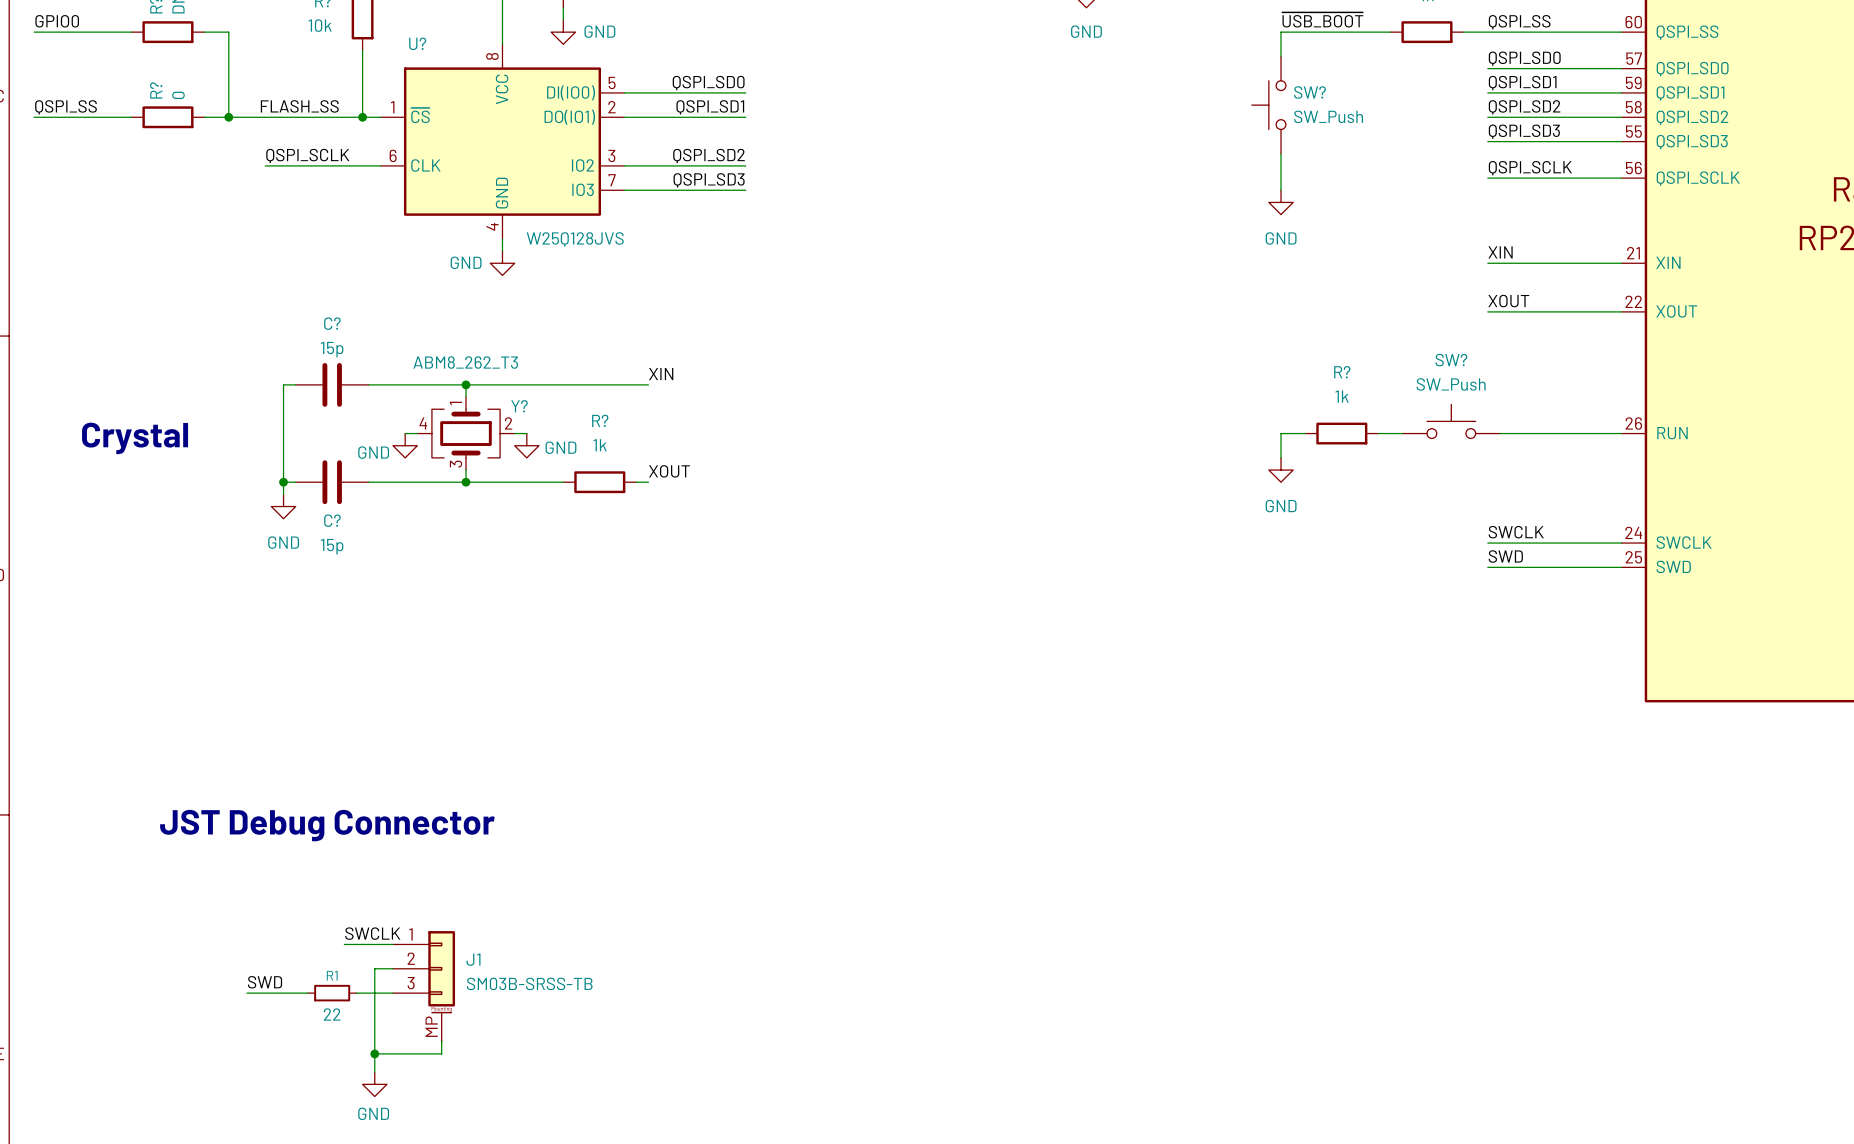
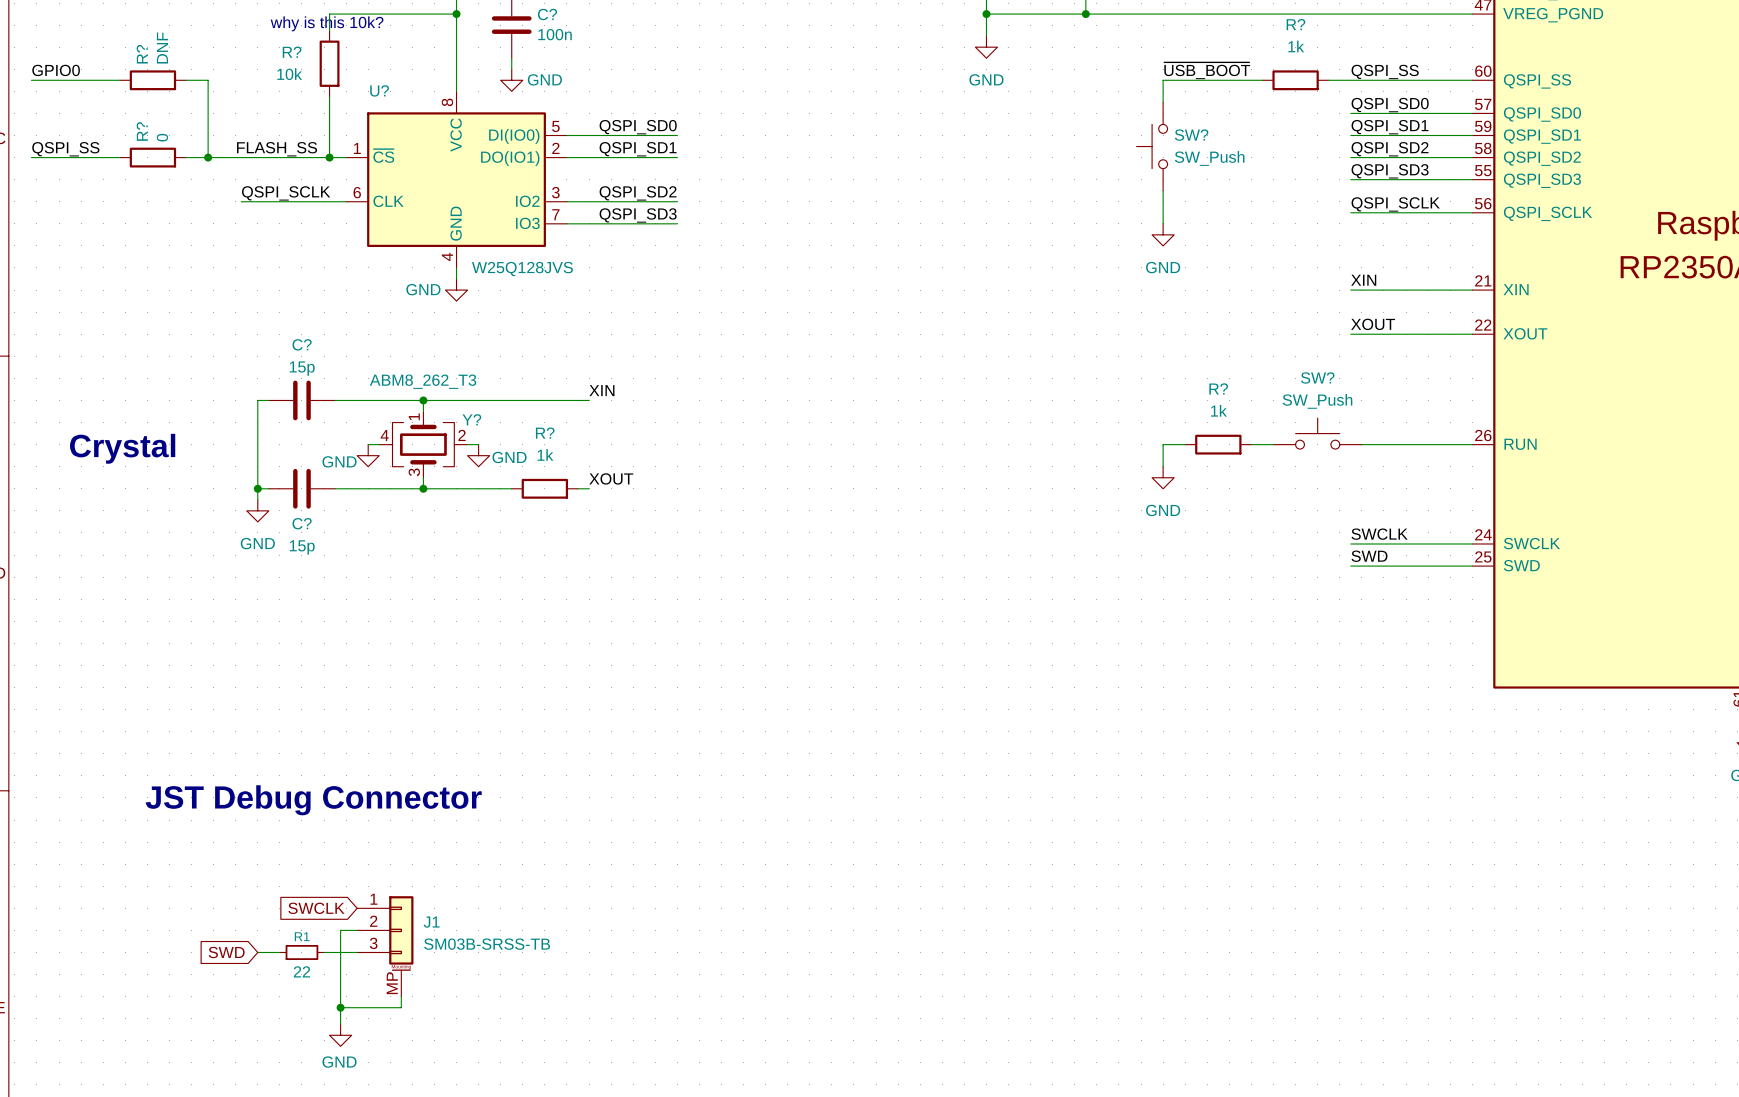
label: SWCLK (372, 933) -> none
wire: (344, 944) (393, 944) -> none
global label: none -> SWCLK (316, 908)
label: SWD (265, 982) -> none
wire: (247, 993) (283, 993) -> none
global label: none -> SWD (226, 952)

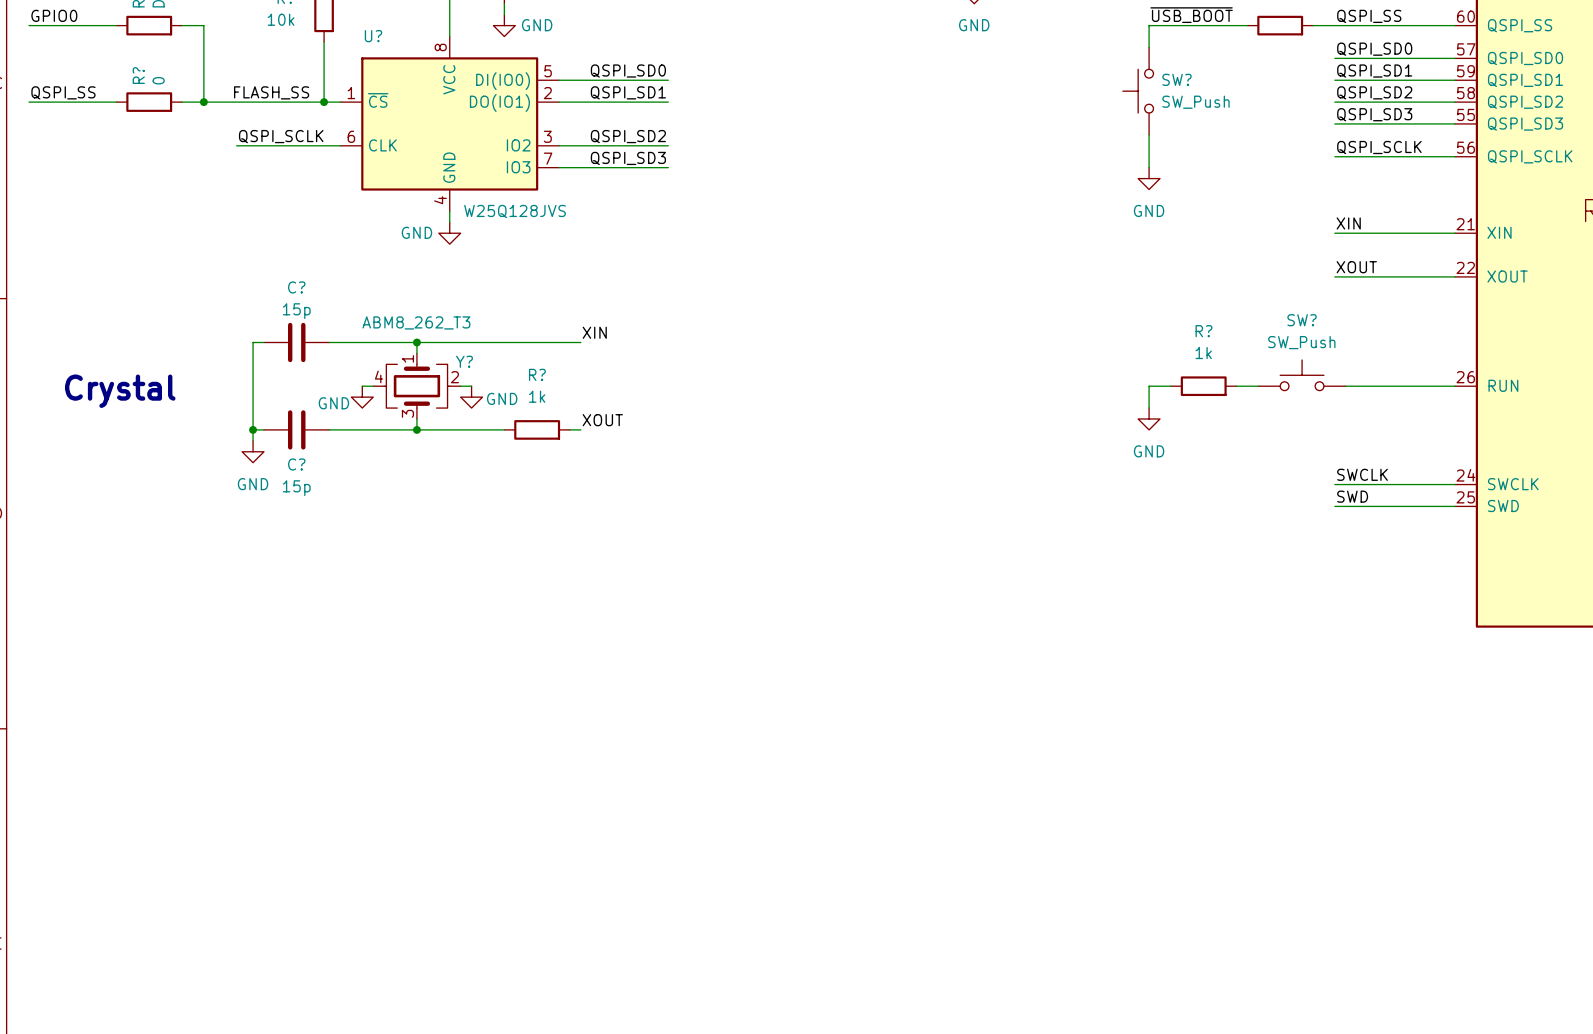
text: JST Debug Connector (313, 800) -> none
global label: SWCLK (316, 908) -> none
wire: (357, 930) (340, 930) (340, 1024) -> none
J1: SM03B-SRSS-TB (385, 946) -> none
global label: SWD (226, 952) -> none
wire: (257, 952) (279, 952) -> none
R1: 22 (301, 952) -> none
wire: (324, 952) (357, 952) -> none
wire: (401, 996) (401, 1007) (340, 1007) -> none
junction: (340, 1007) -> none
power symbol: GND (340, 1035) -> none

